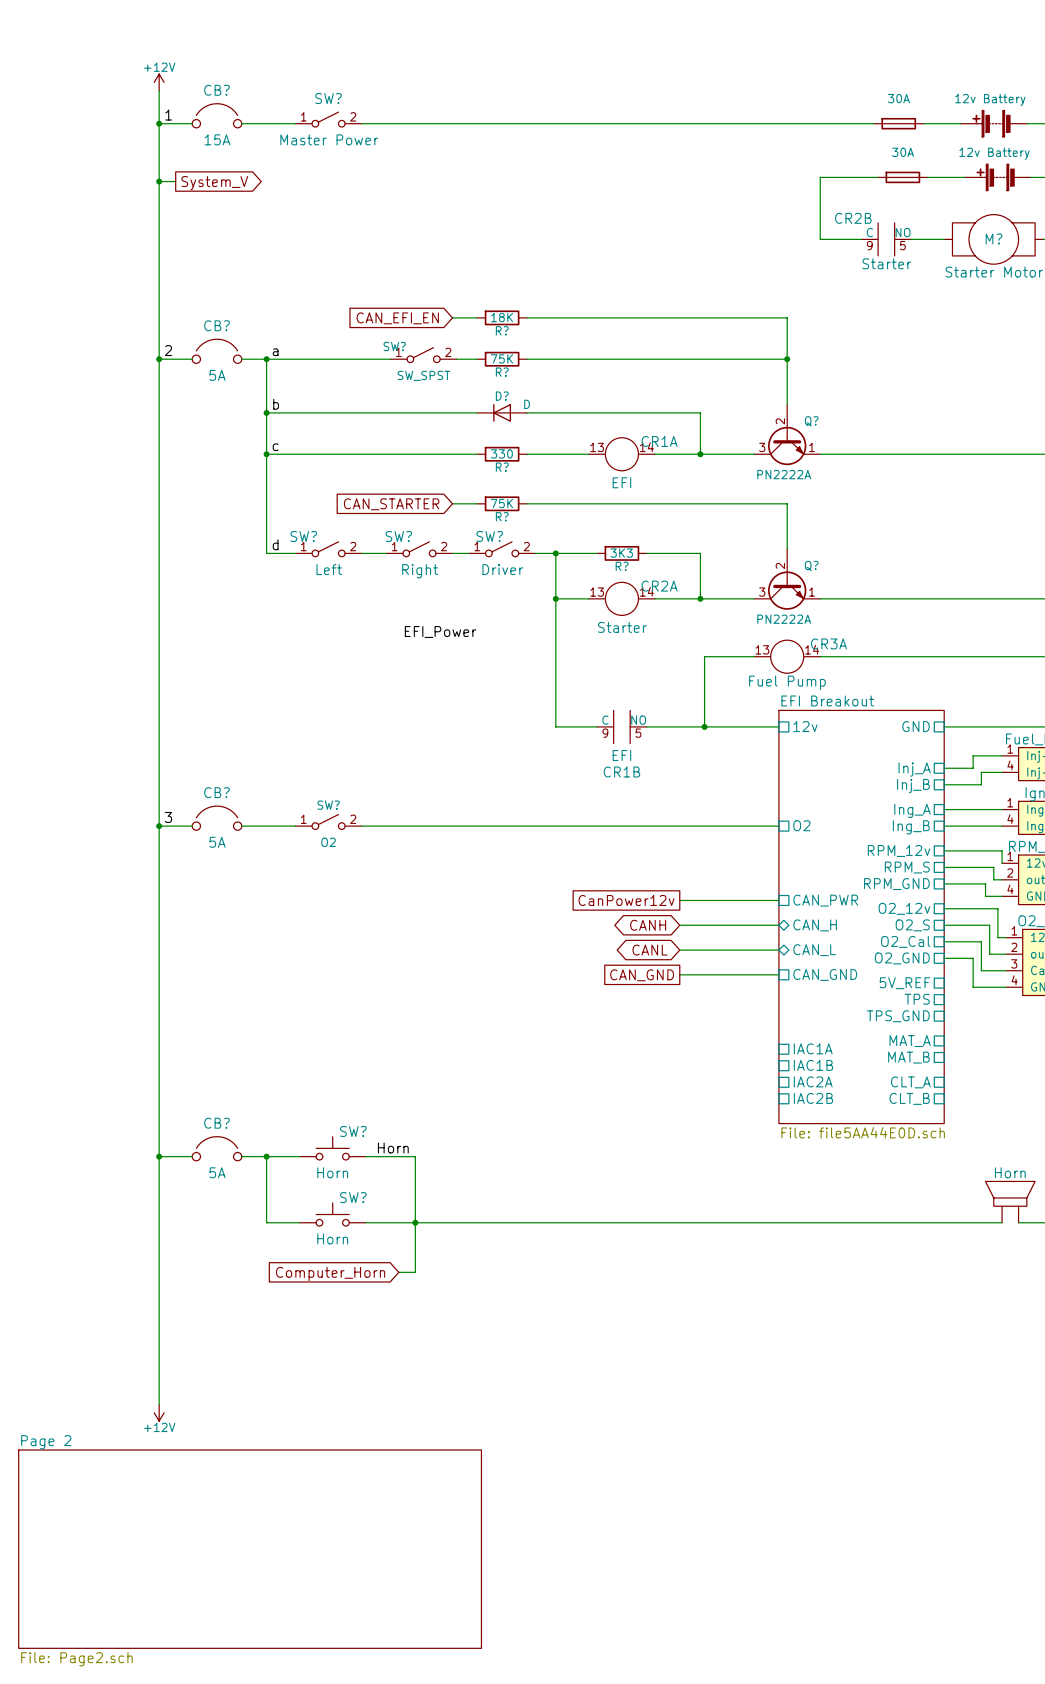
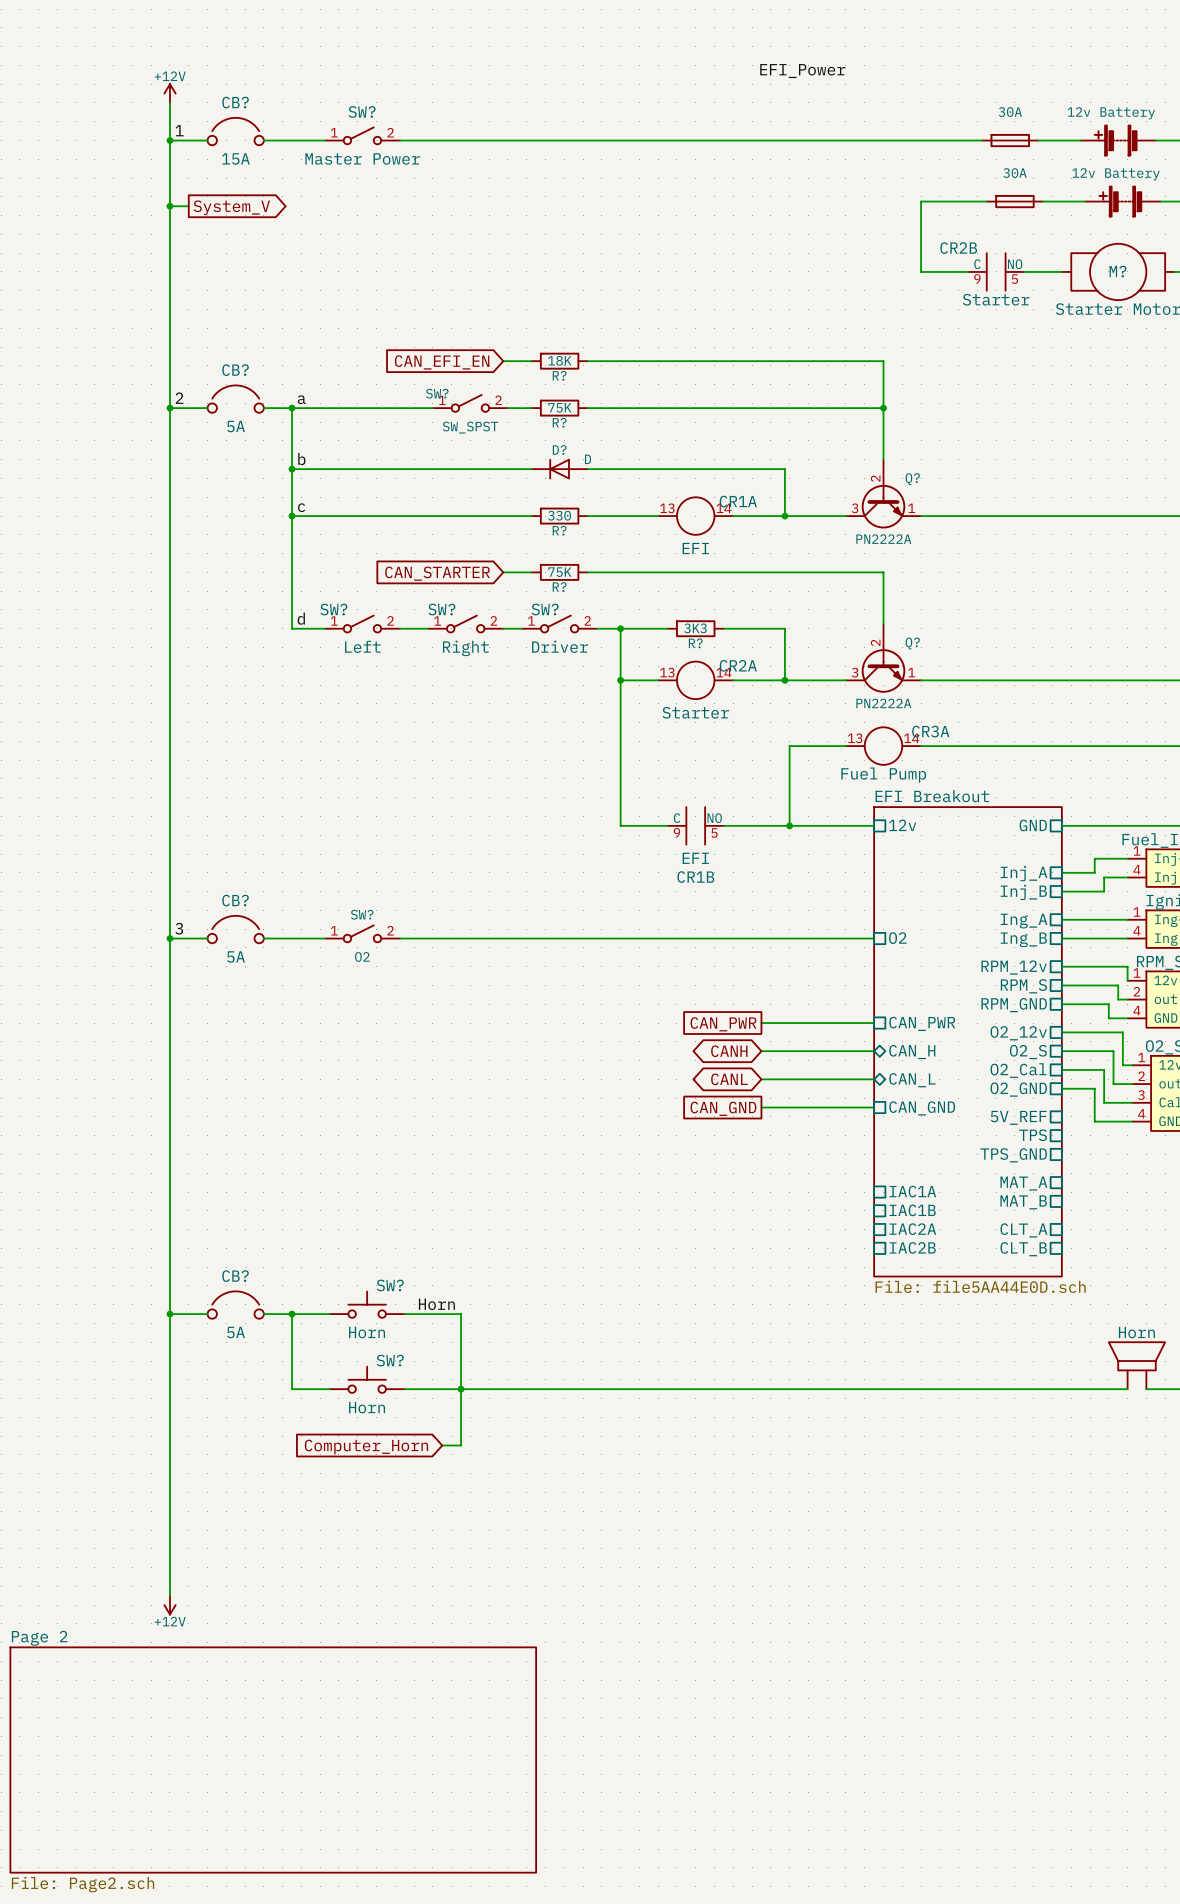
label: none -> EFI_Power (802, 71)
label: EFI_Power (440, 632) -> none
global label: CanPower12v (626, 900) -> CAN_PWR (723, 1024)

